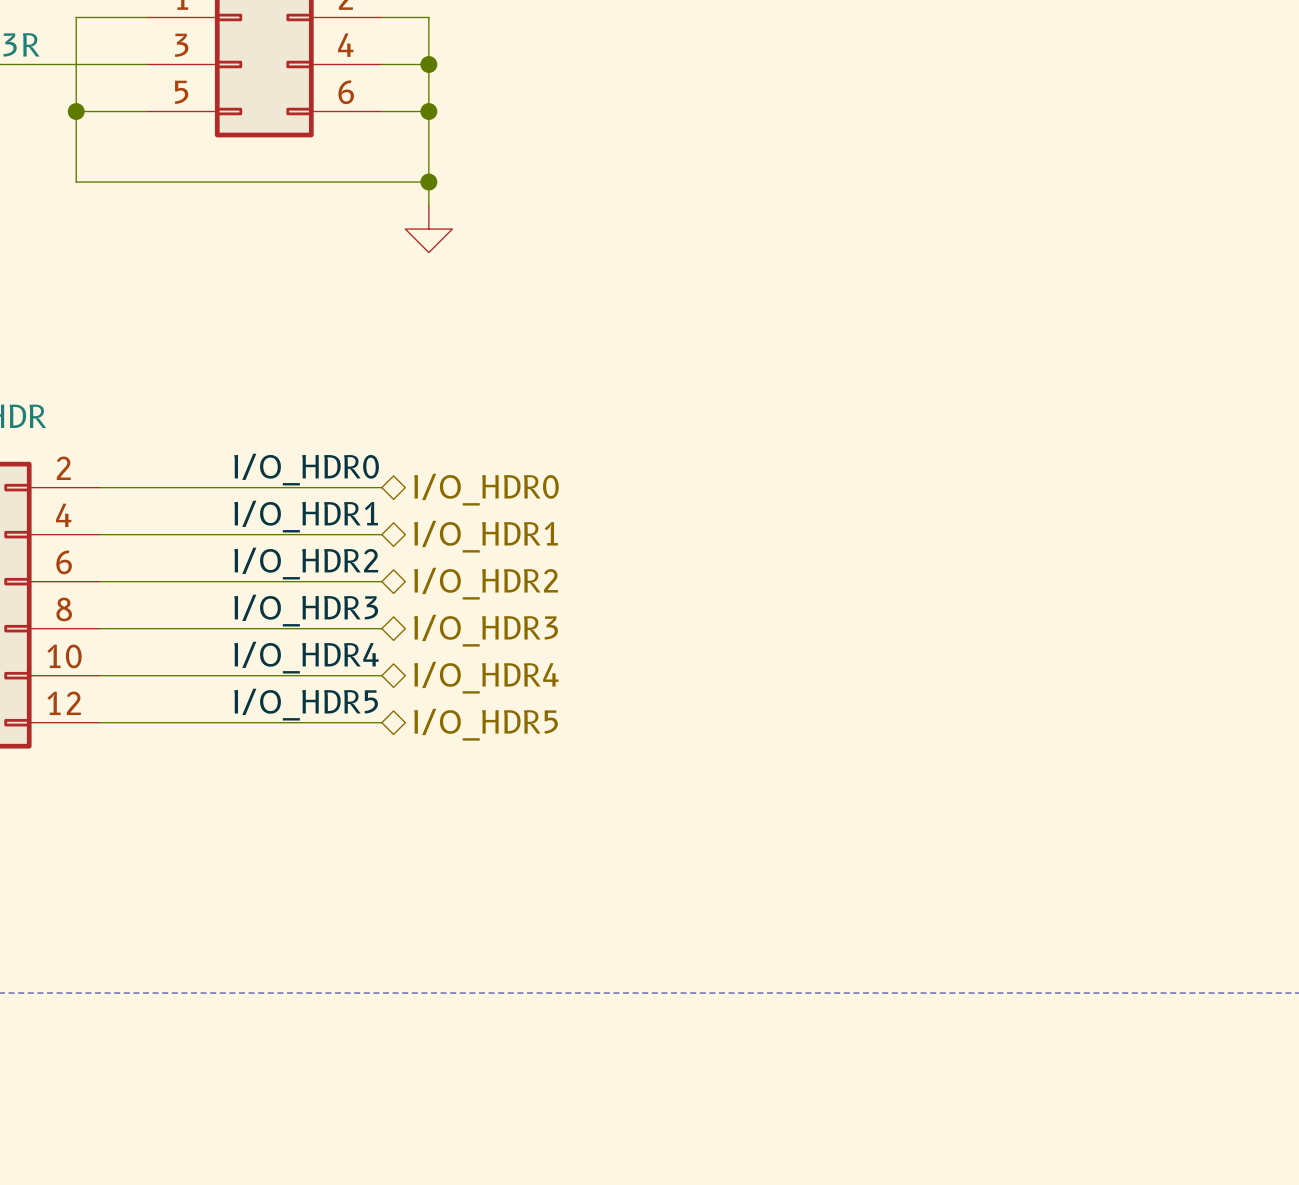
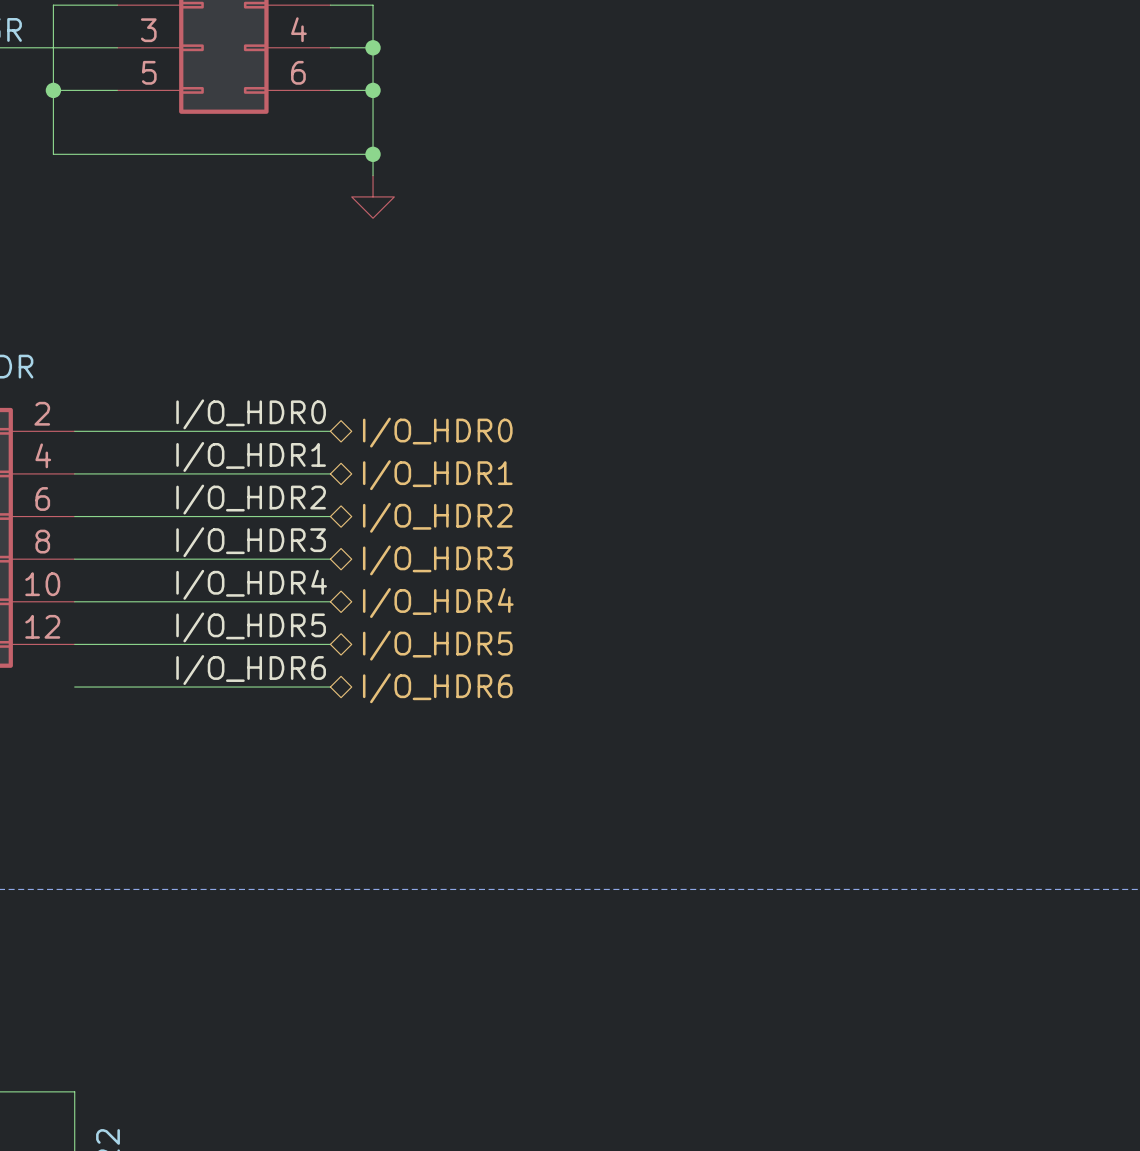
label: none -> I/O_HDR6 (251, 670)
wire: none -> (74, 687) (330, 687)
hierarchical label: none -> I/O_HDR6 (437, 688)

